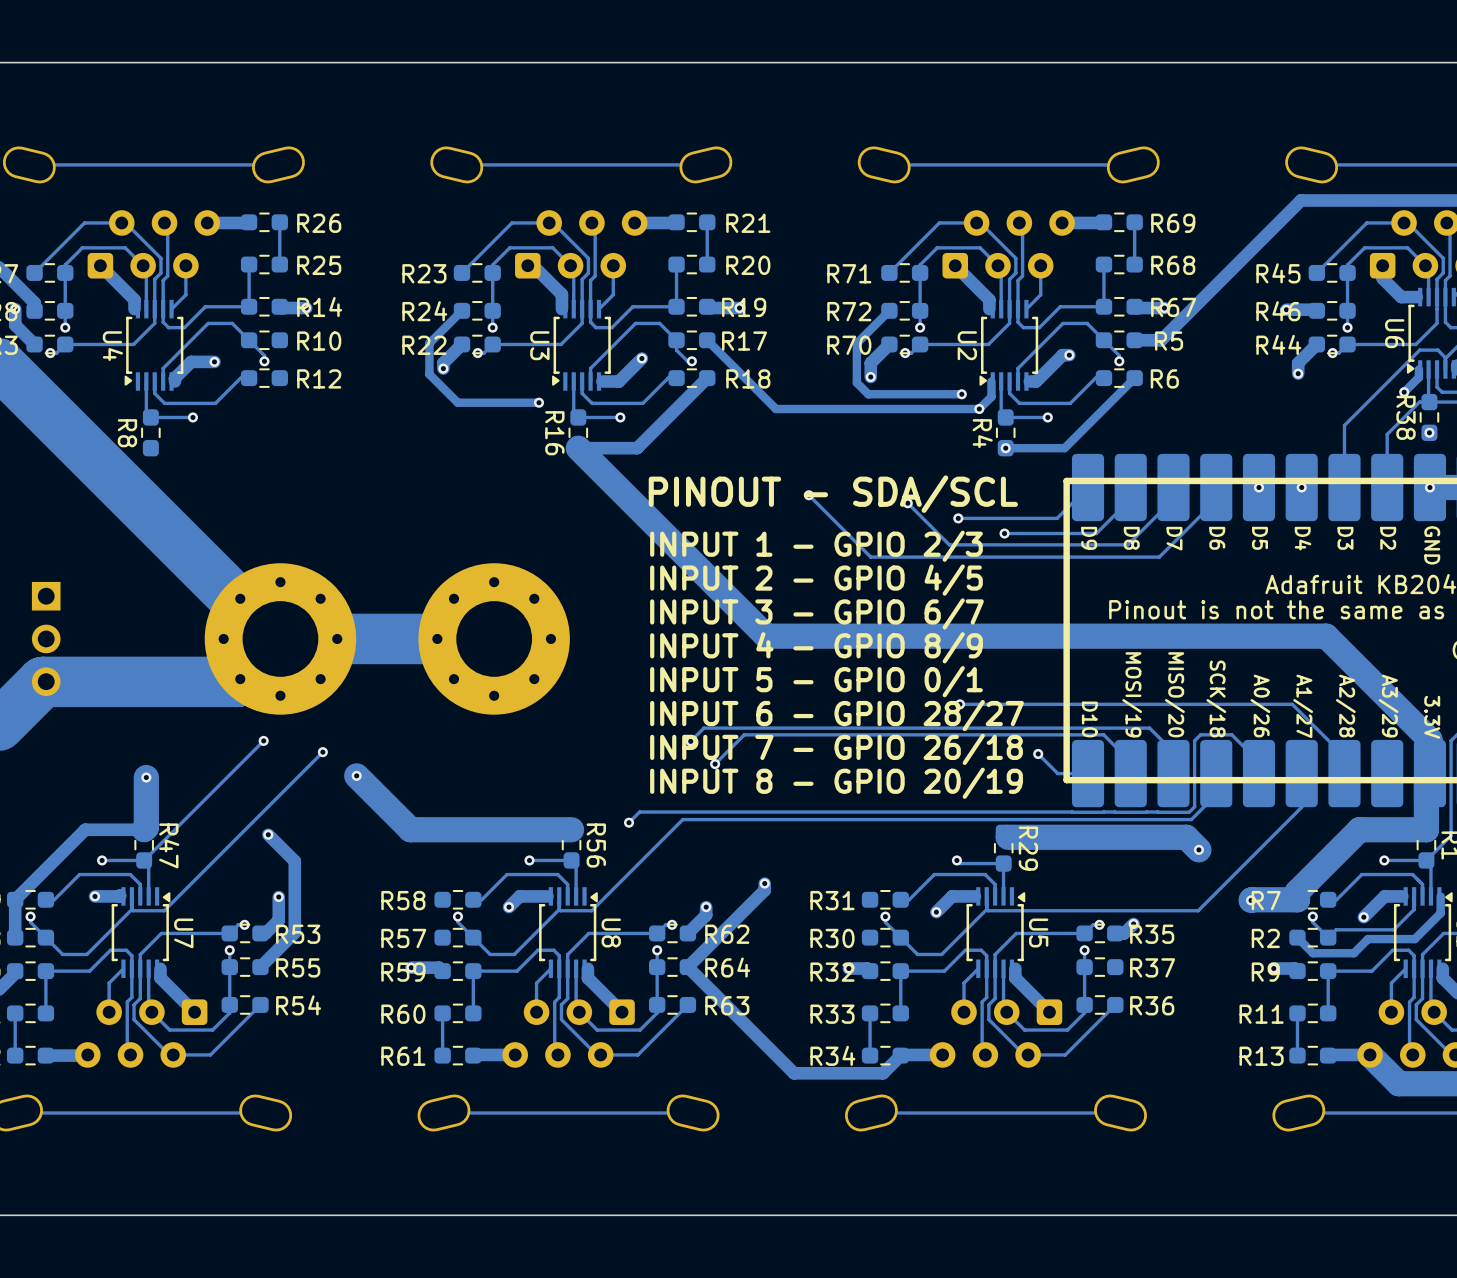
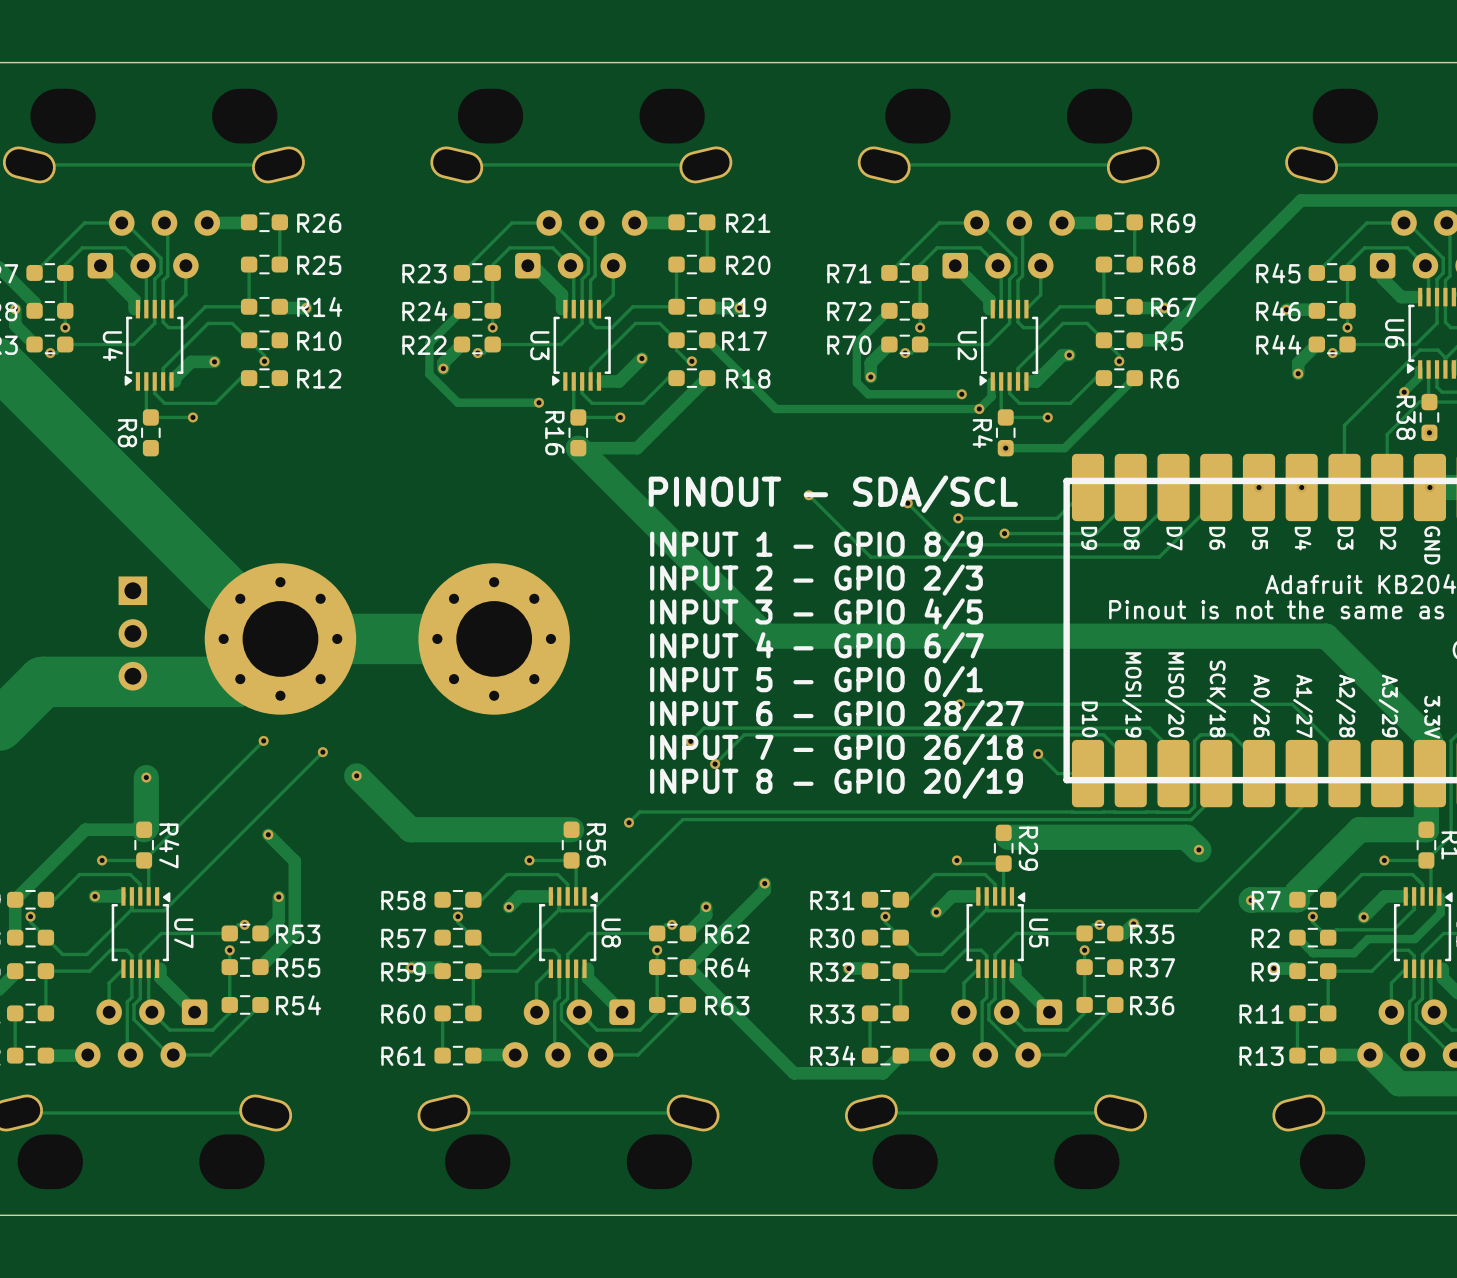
text: INPUT 1 - GPIO 2/3 (816, 546) -> INPUT 1 - GPIO 8/9 (816, 546)
text: INPUT 2 - GPIO 4/5 (816, 580) -> INPUT 2 - GPIO 2/3 (816, 580)
text: INPUT 3 - GPIO 6/7 (816, 613) -> INPUT 3 - GPIO 4/5 (816, 613)
part position: (46, 638) -> (132, 633)
text: INPUT 4 - GPIO 8/9 (816, 647) -> INPUT 4 - GPIO 6/7 (816, 647)

